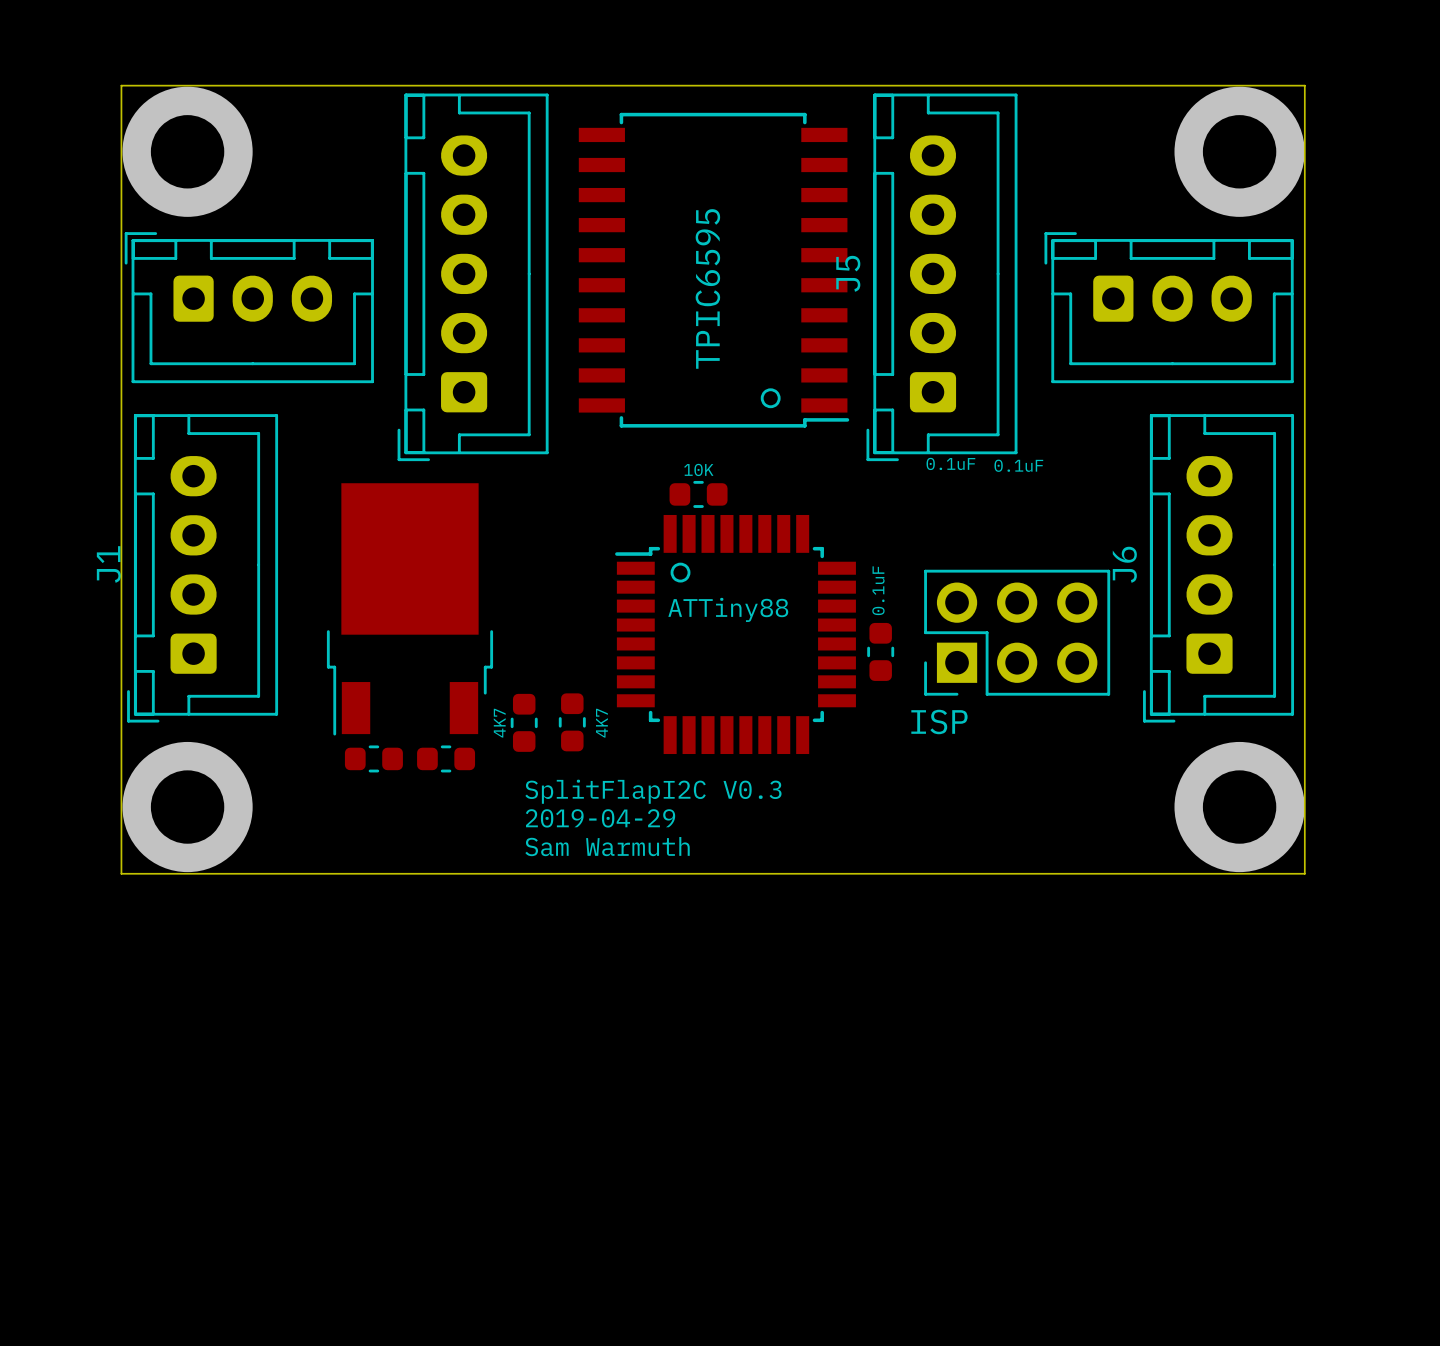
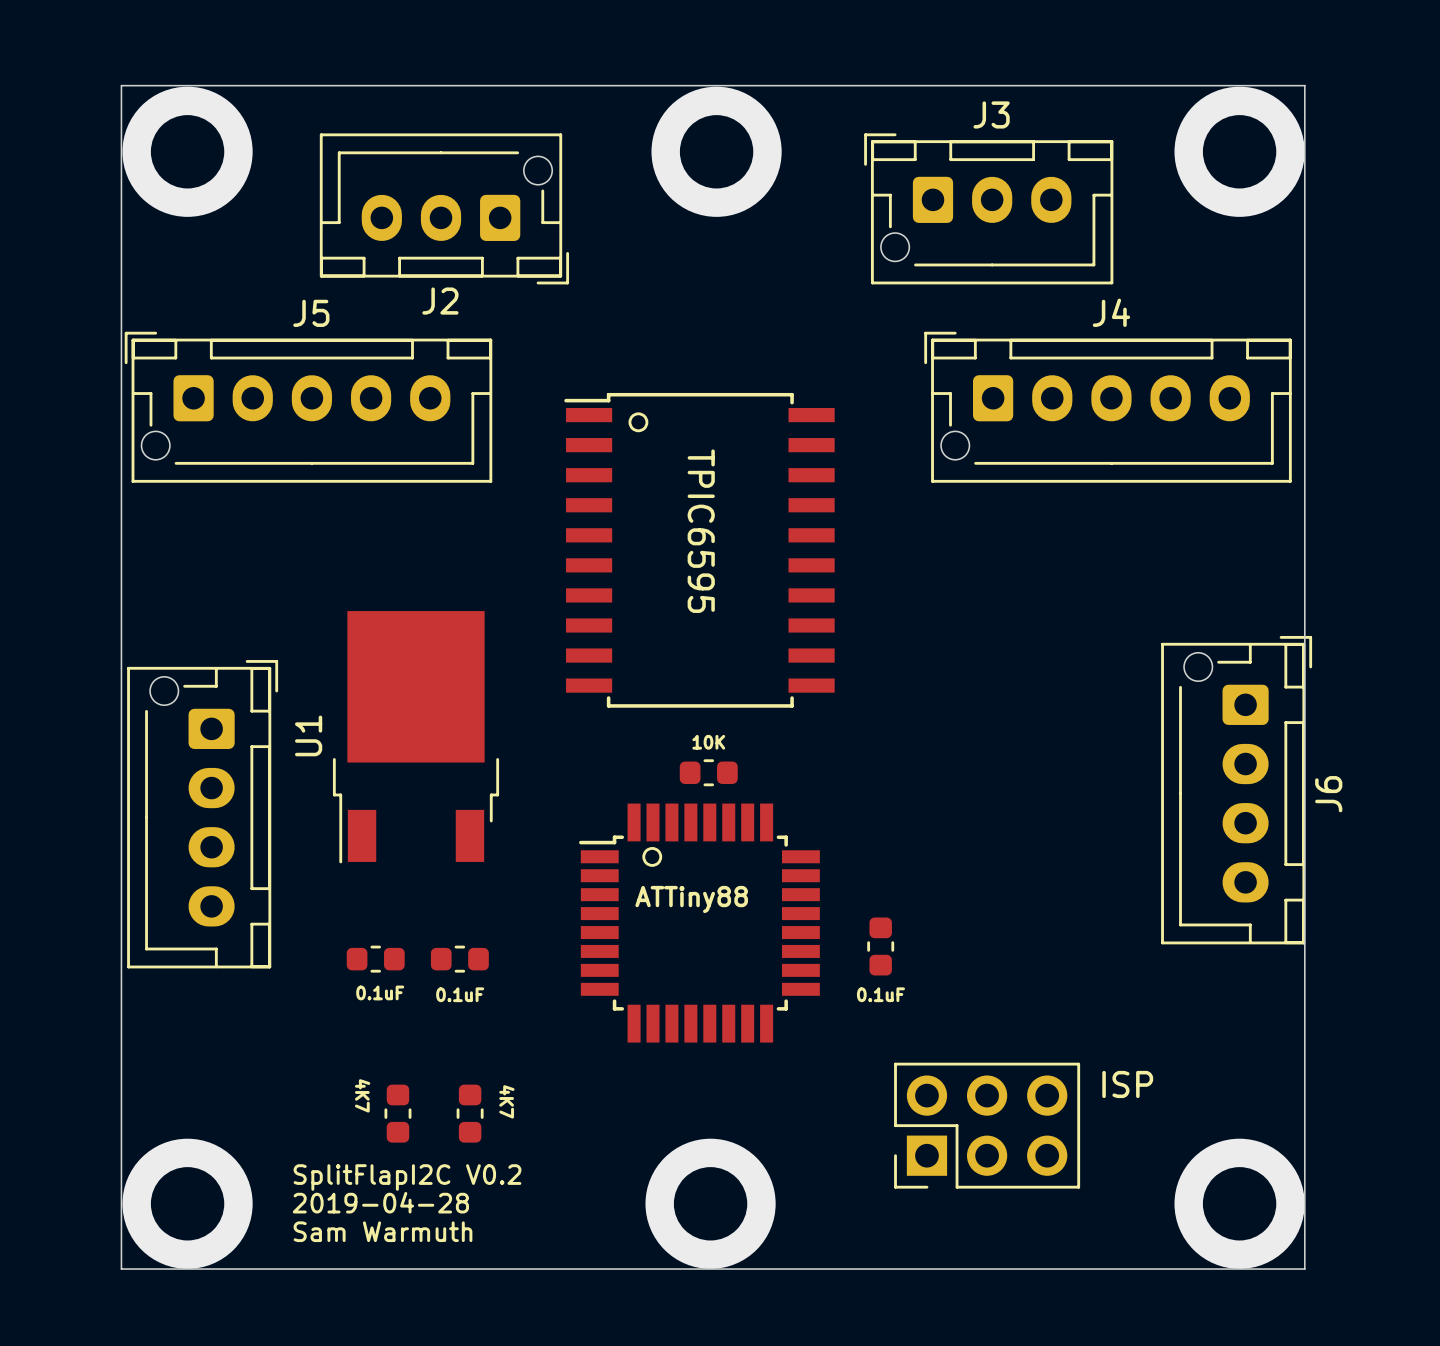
J5 footprint: [866, 93, 1018, 462] -> [124, 331, 493, 483]
via: none -> (716, 151)
J2: none -> (444, 208)
J3: none -> (988, 208)
part rotation: 0° (714, 270) -> 180° (699, 550)
part position: (714, 270) -> (699, 550)
J5 name position: J5 (848, 273) -> J5 (311, 313)
part: (473, 277) -> none
text rotation: 0° (707, 288) -> 180° (701, 531)
text position: TPIC6595 (707, 288) -> TPIC6595 (701, 531)
part: (249, 307) -> none
part: (1169, 307) -> none
drawing: [760, 388, 781, 409] -> none
J4: none -> (1108, 407)
drawing: none -> [628, 412, 649, 433]
J6 footprint: [1143, 414, 1295, 723] -> [1161, 635, 1313, 945]
text: 0.1uF (950, 463) -> none
text: 0.1uF (1018, 465) -> none
text position: 10K (698, 469) -> 10K (708, 742)
part: (698, 494) -> none
drawing: [670, 562, 691, 583] -> none
J6 name position: J6 (1124, 564) -> J6 (1328, 794)
J1: (202, 568) -> none
text: 0.1uF (878, 590) -> none
part: (409, 609) -> none
text position: ATTiny88 (728, 609) -> ATTiny88 (691, 899)
part position: (1017, 632) -> (987, 1125)
part position: (735, 634) -> (699, 923)
part: (880, 651) -> none
text position: ISP (939, 721) -> ISP (1127, 1084)
part: (524, 722) -> none
part: (572, 722) -> none
text: 4K7 (499, 723) -> none
text: 4K7 (601, 723) -> none
U1: none -> (416, 737)
part: (373, 758) -> none
part: (446, 758) -> none
part: none -> (708, 772)
text: SplitFlapI2C V0.3 (653, 791) -> none
via: (187, 807) -> none
via: (1239, 807) -> none
part: none -> (202, 814)
text: 2019-04-29 (600, 818) -> none
text position: Sam Warmuth (607, 846) -> Sam Warmuth (383, 1231)
drawing: none -> [642, 847, 663, 867]
board edge: (121, 873) (1304, 873) -> (121, 873) (121, 1269) (1304, 1269) (1304, 873)
part: none -> (880, 946)
part: none -> (375, 959)
part: none -> (459, 959)
text: none -> 0.1uF (380, 992)
text: none -> 0.1uF (460, 994)
text: none -> 0.1uF (880, 994)
text: none -> 4K7 (362, 1095)
text: none -> 4K7 (506, 1101)
part: none -> (397, 1113)
part: none -> (470, 1113)
text: none -> SplitFlapI2C V0.2 (407, 1177)
via: none -> (187, 1203)
text: none -> 2019-04-28 (380, 1202)
via: none -> (710, 1203)
via: none -> (1239, 1203)

